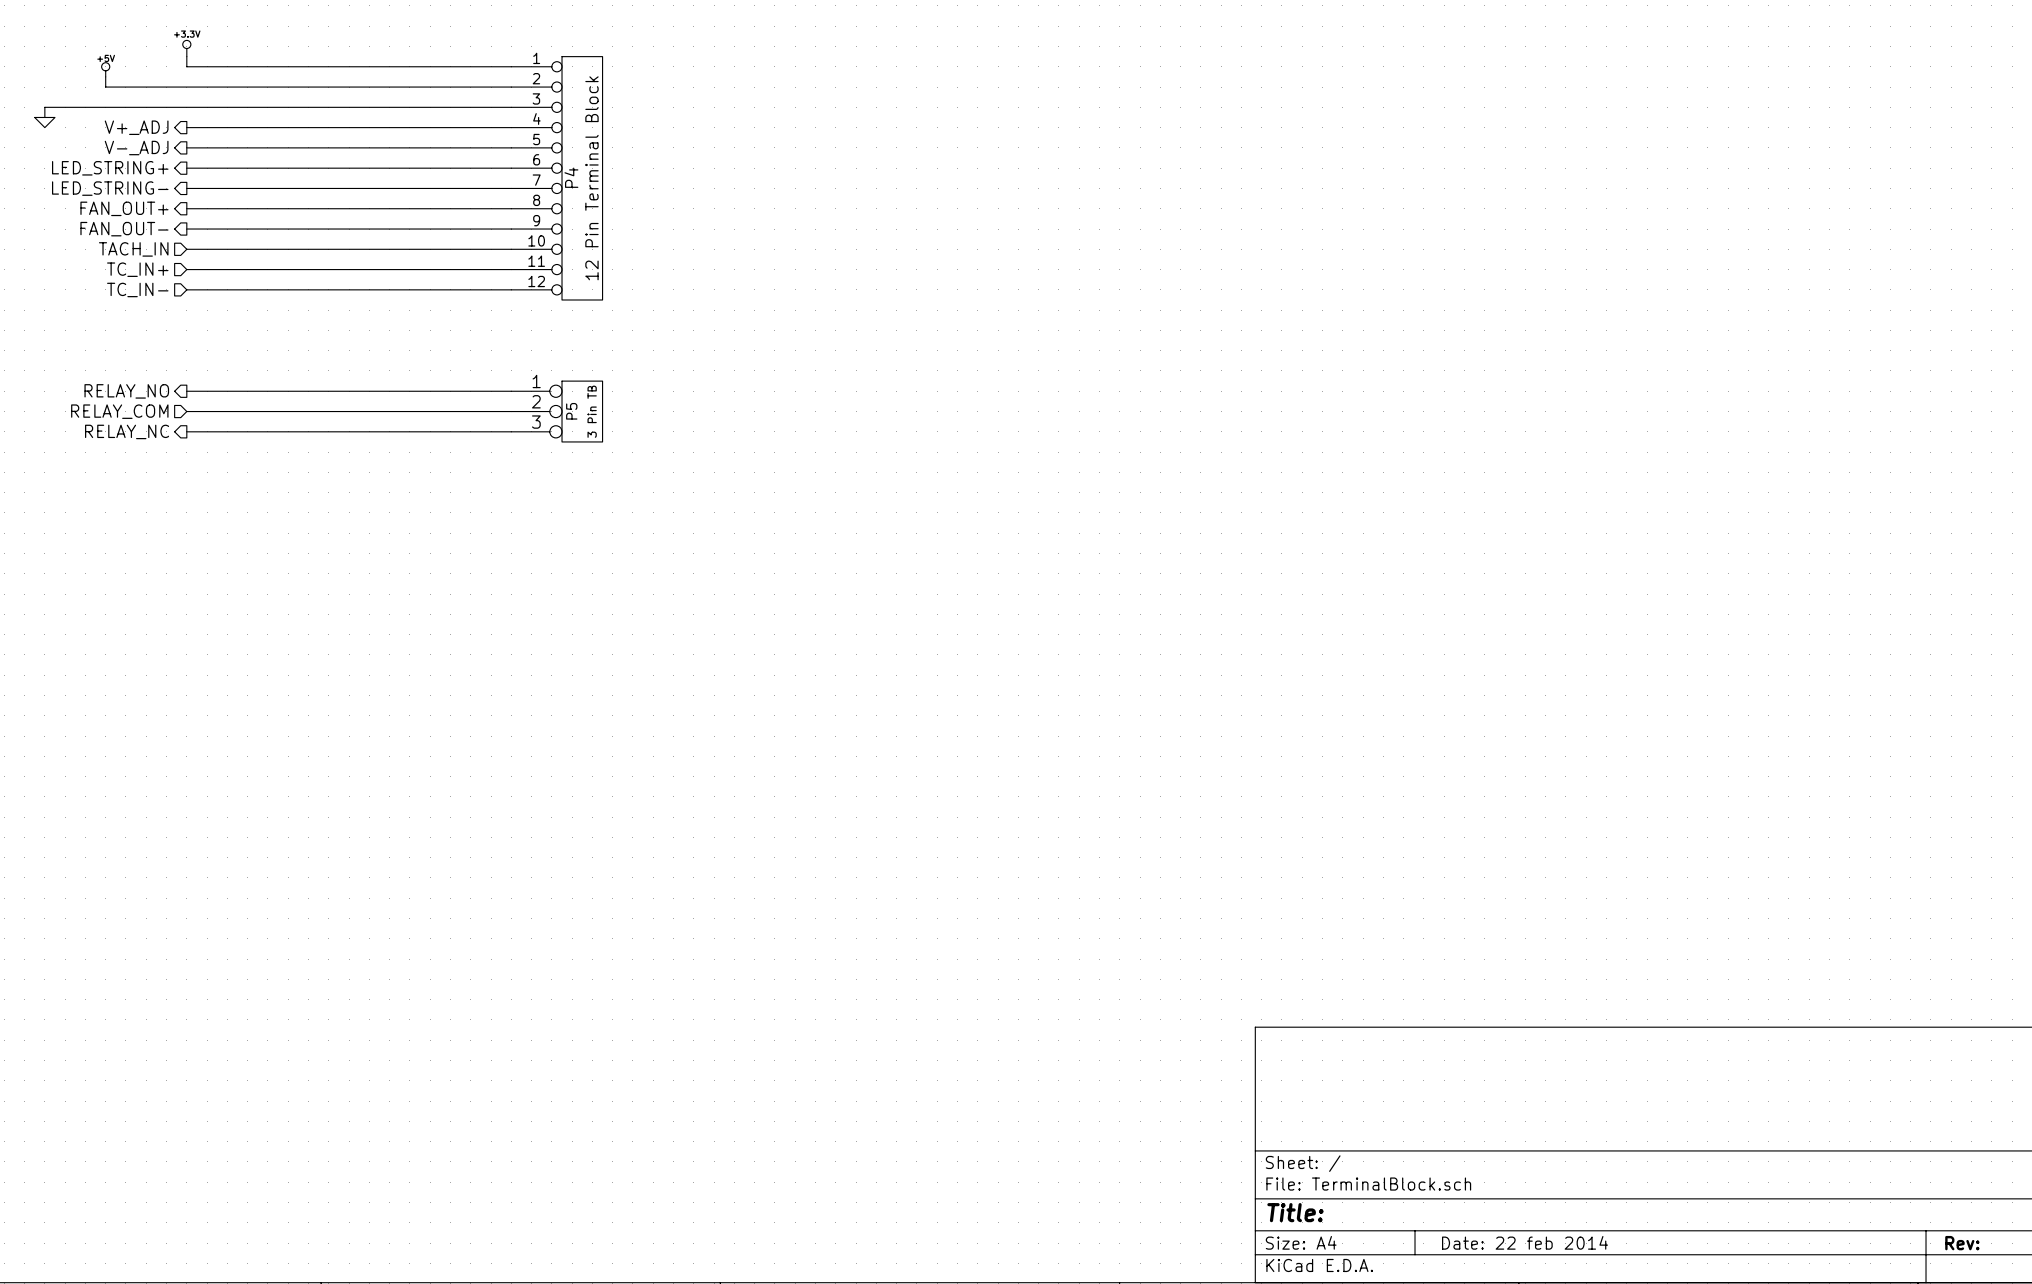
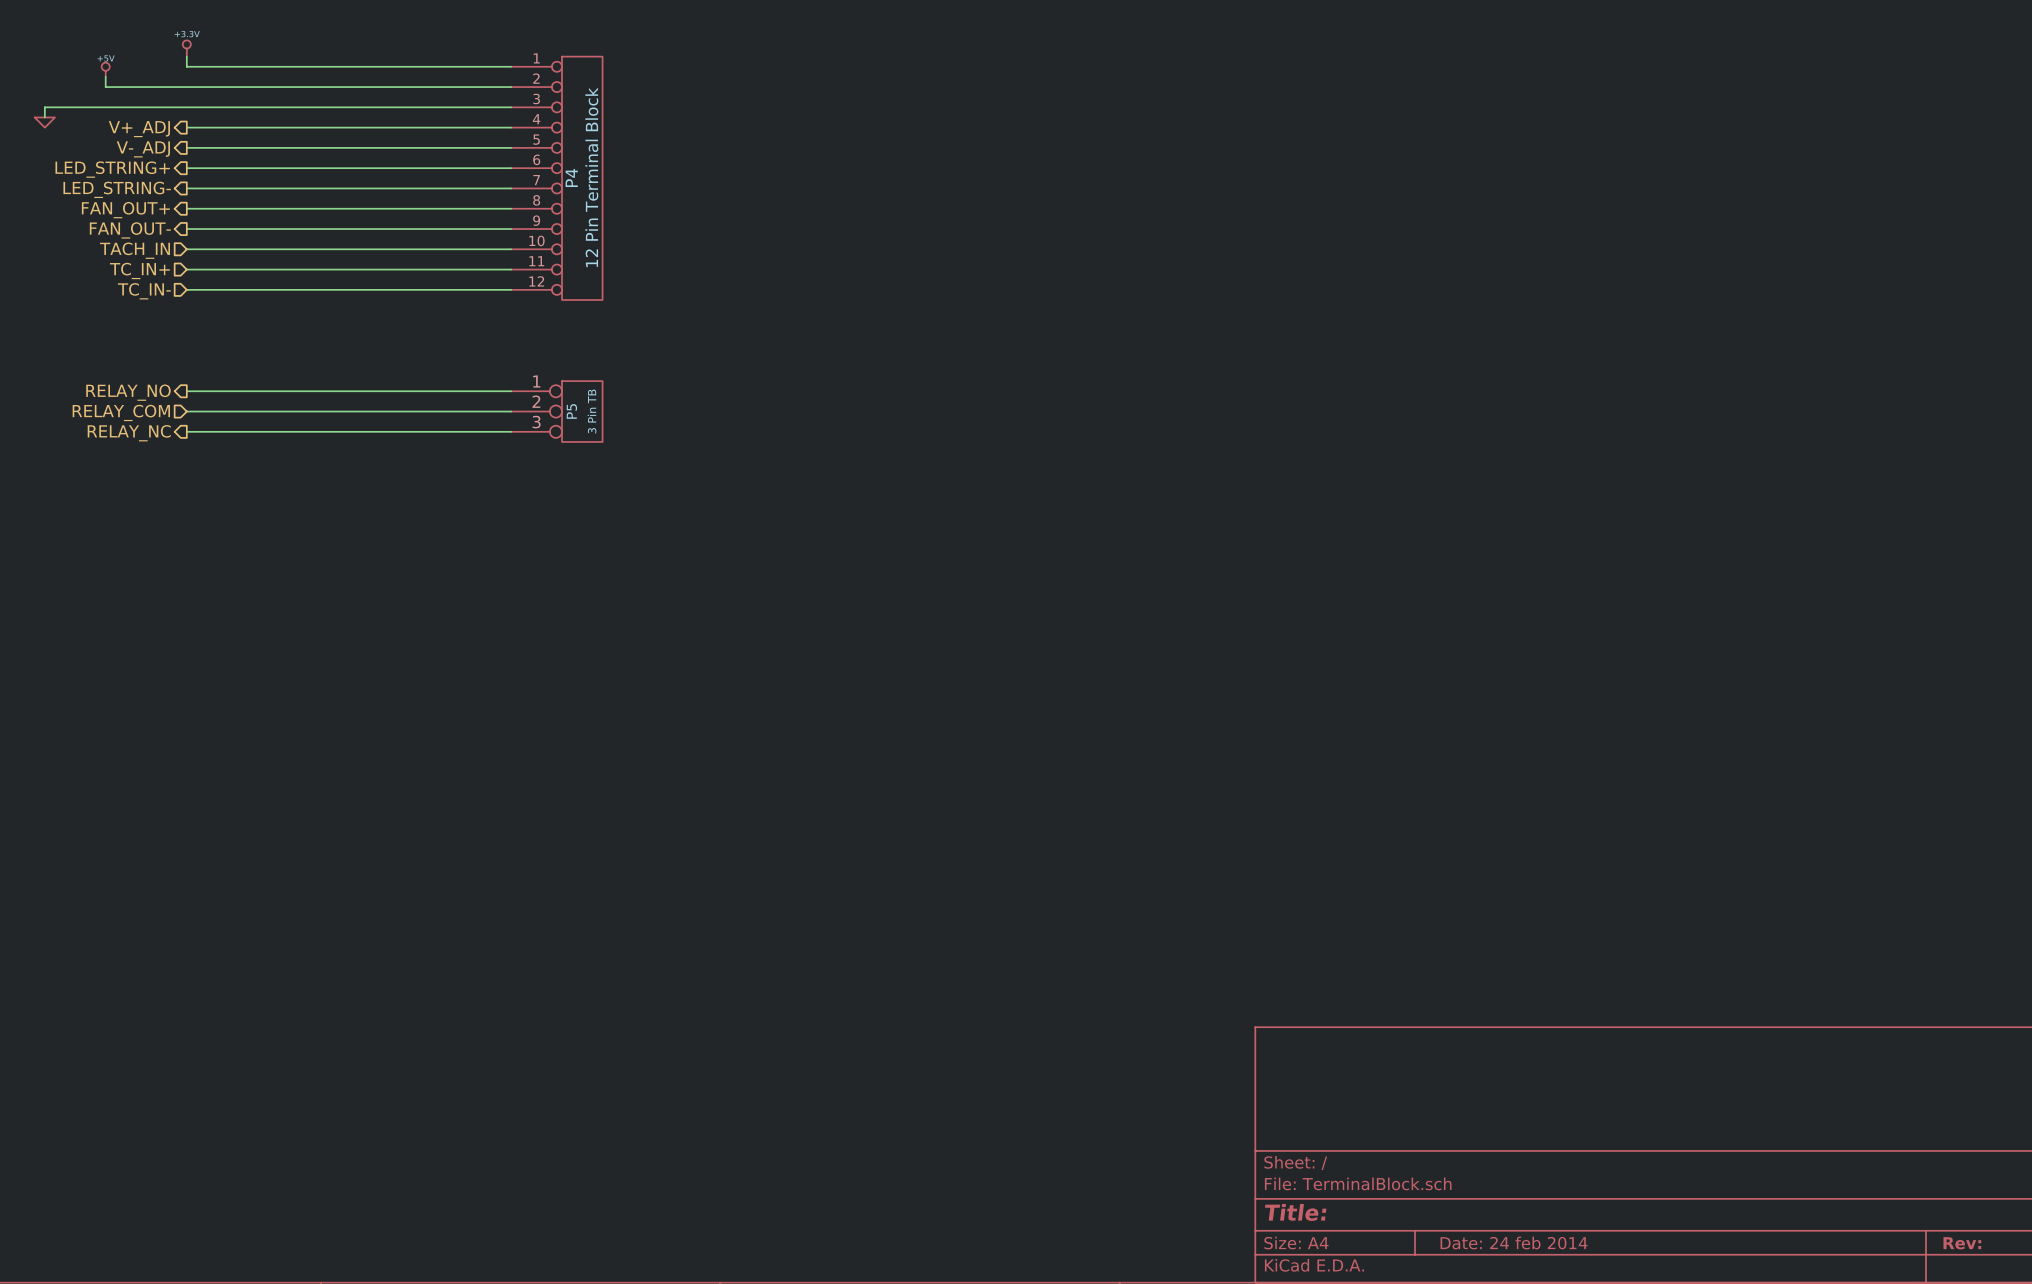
title block: Date: 22 feb 2014 (1525, 1242) -> Date: 24 feb 2014 (1514, 1242)

